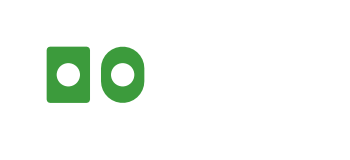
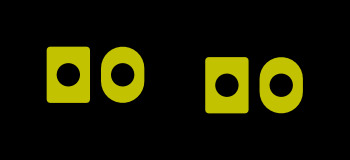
part: none -> (254, 85)

